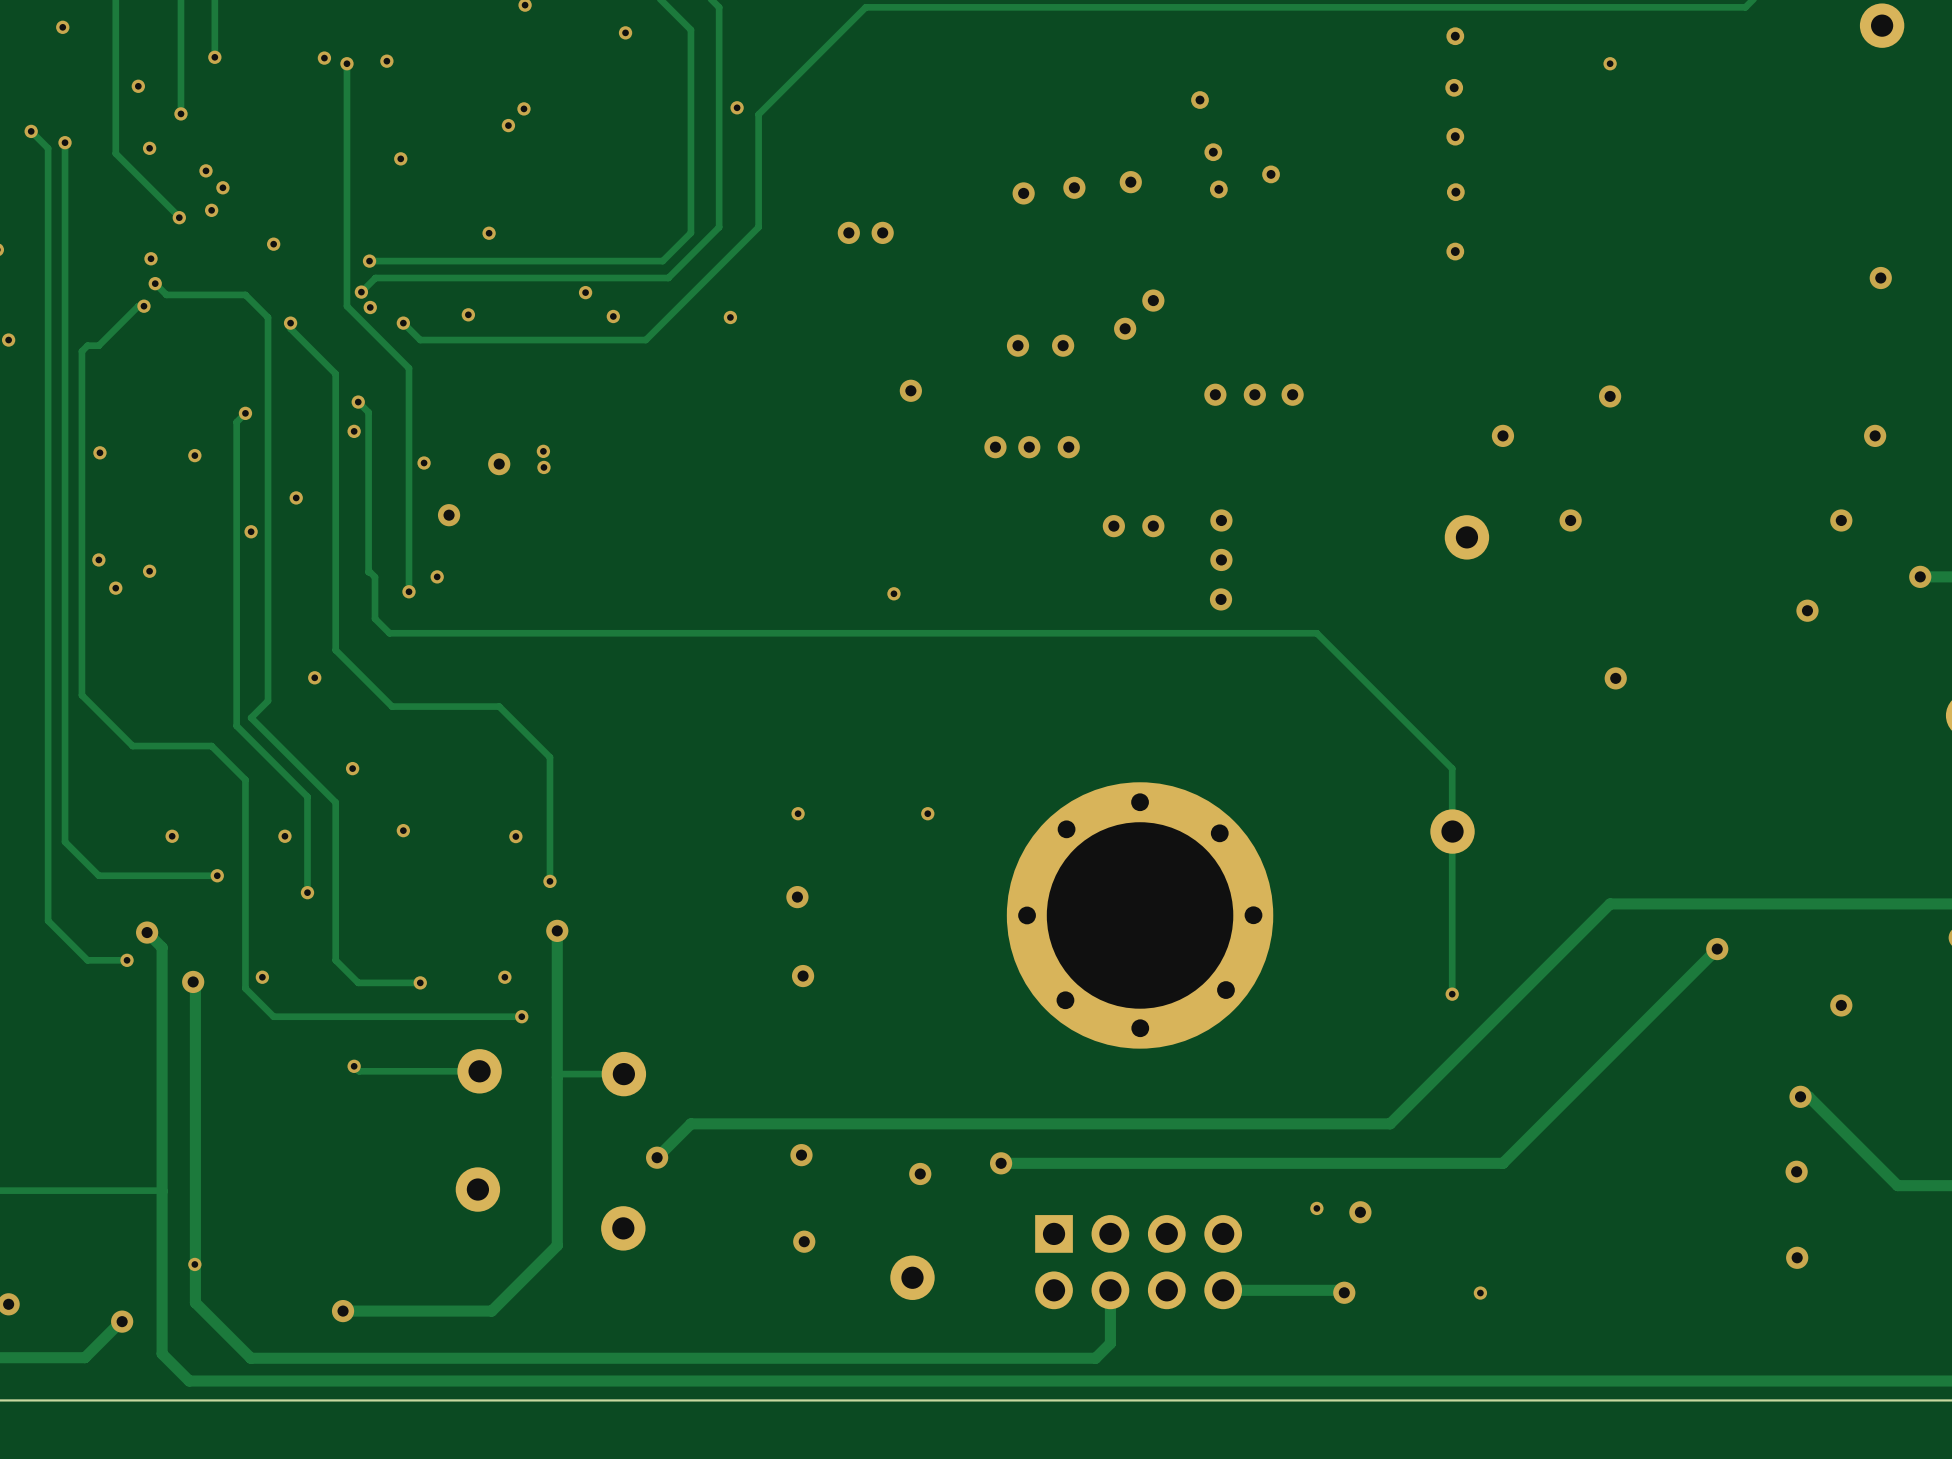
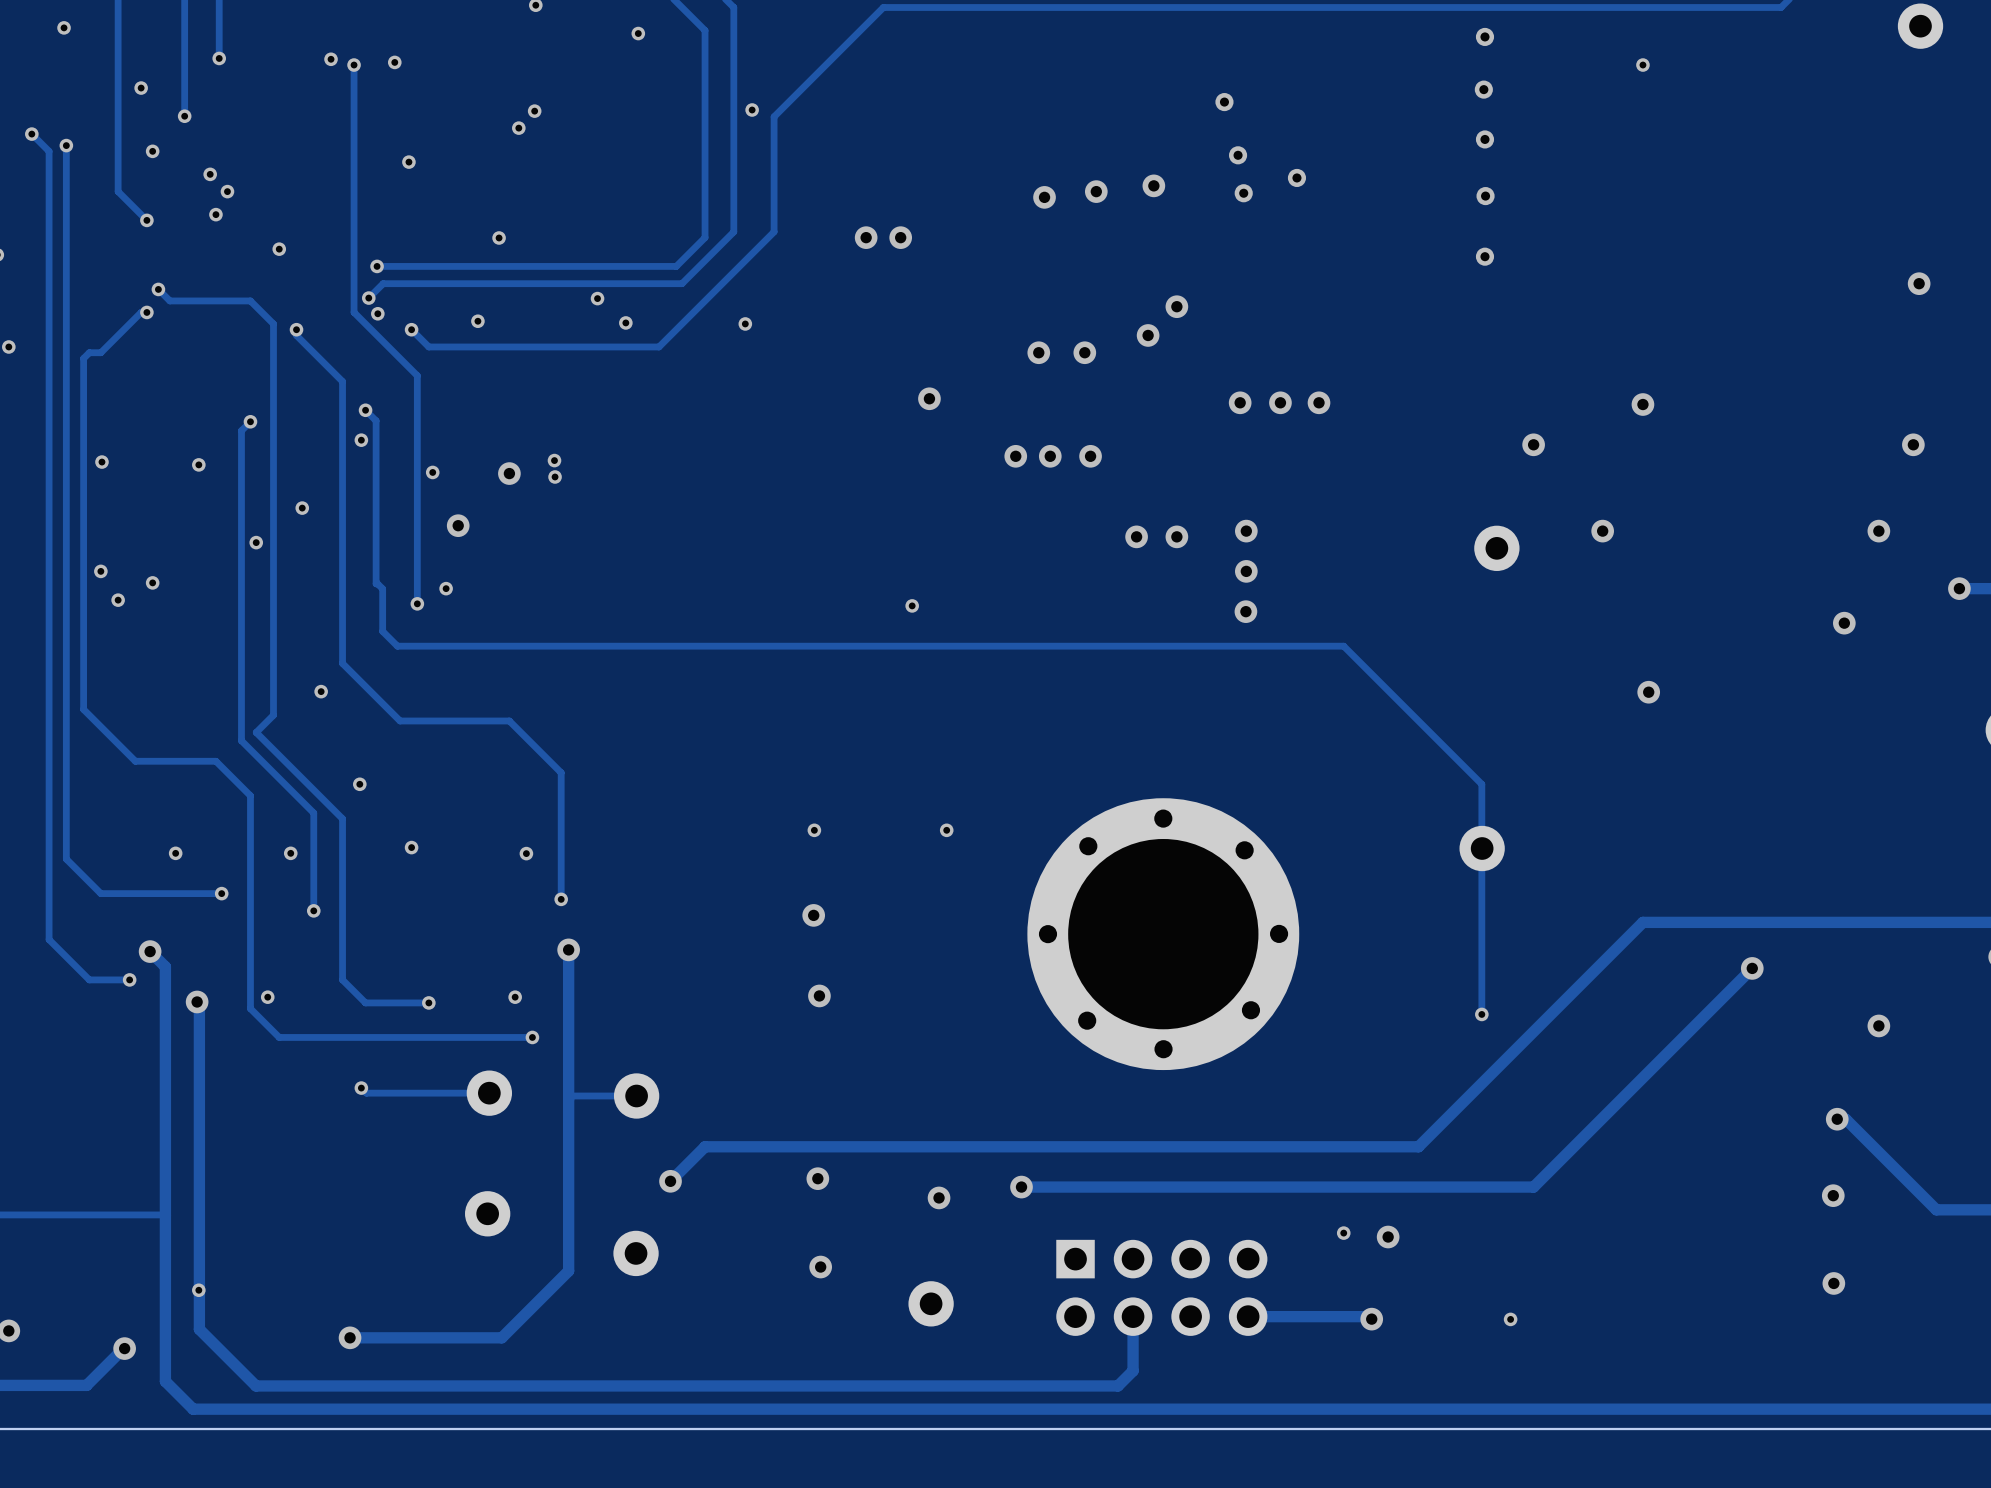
track: (115, 153) (179, 217) -> (118, 156) (118, 191) (146, 220)
via: none -> (146, 220)
via: (179, 217) -> none
via: (151, 258) -> none

